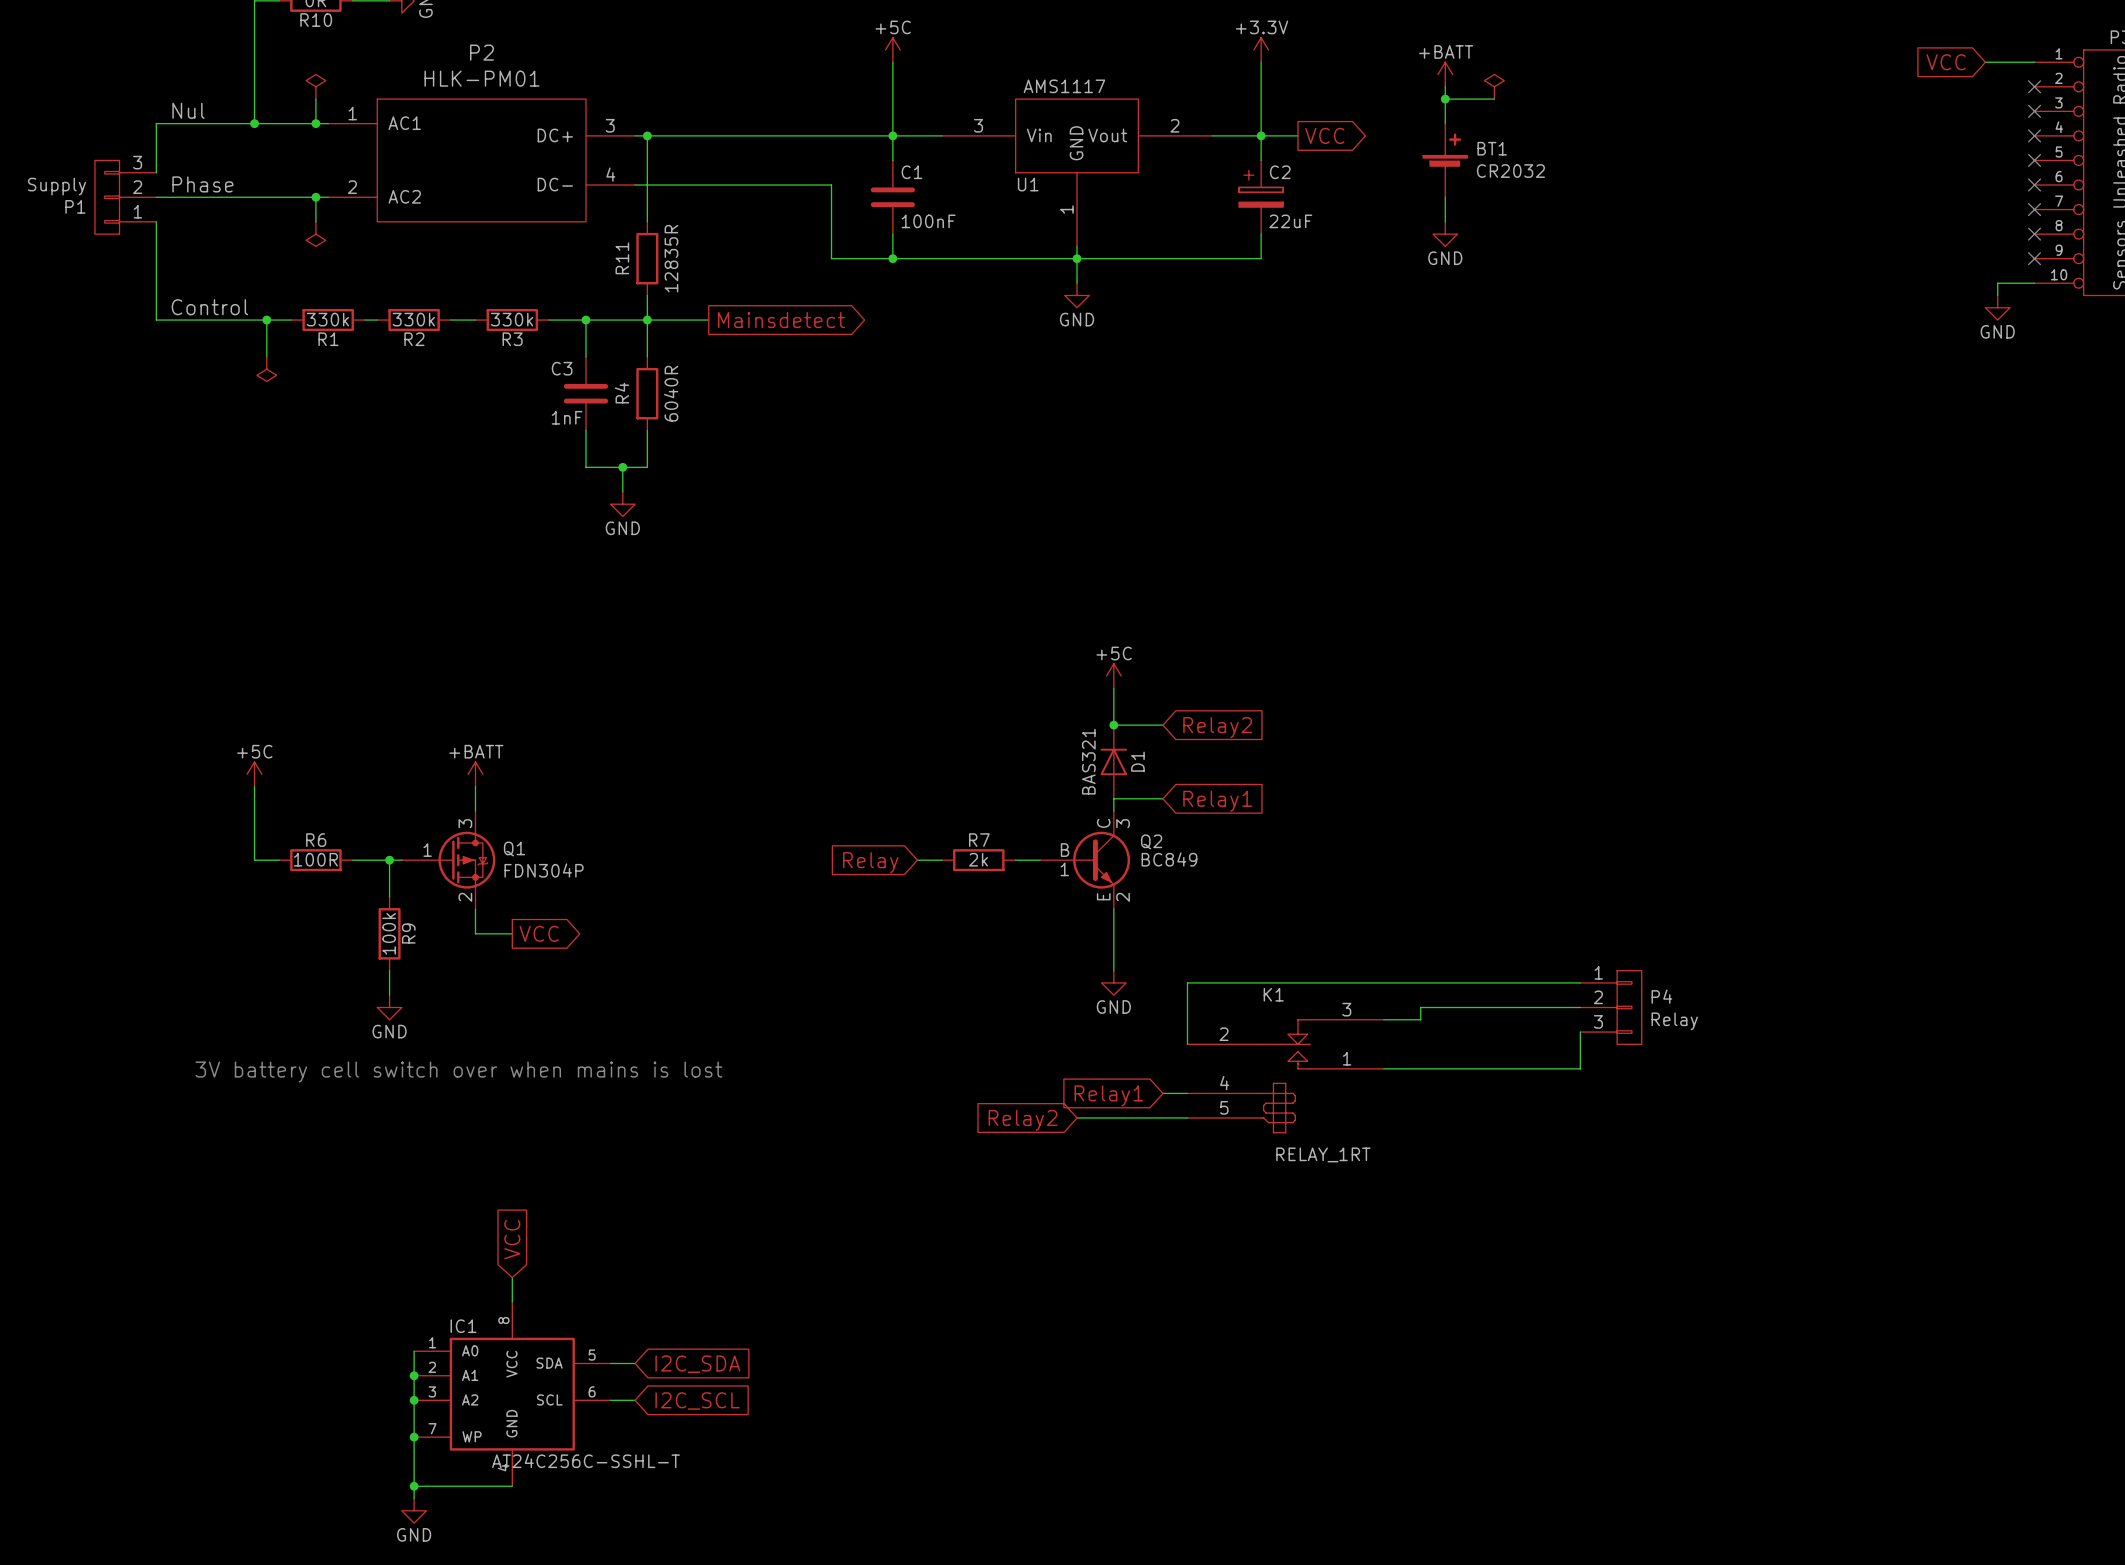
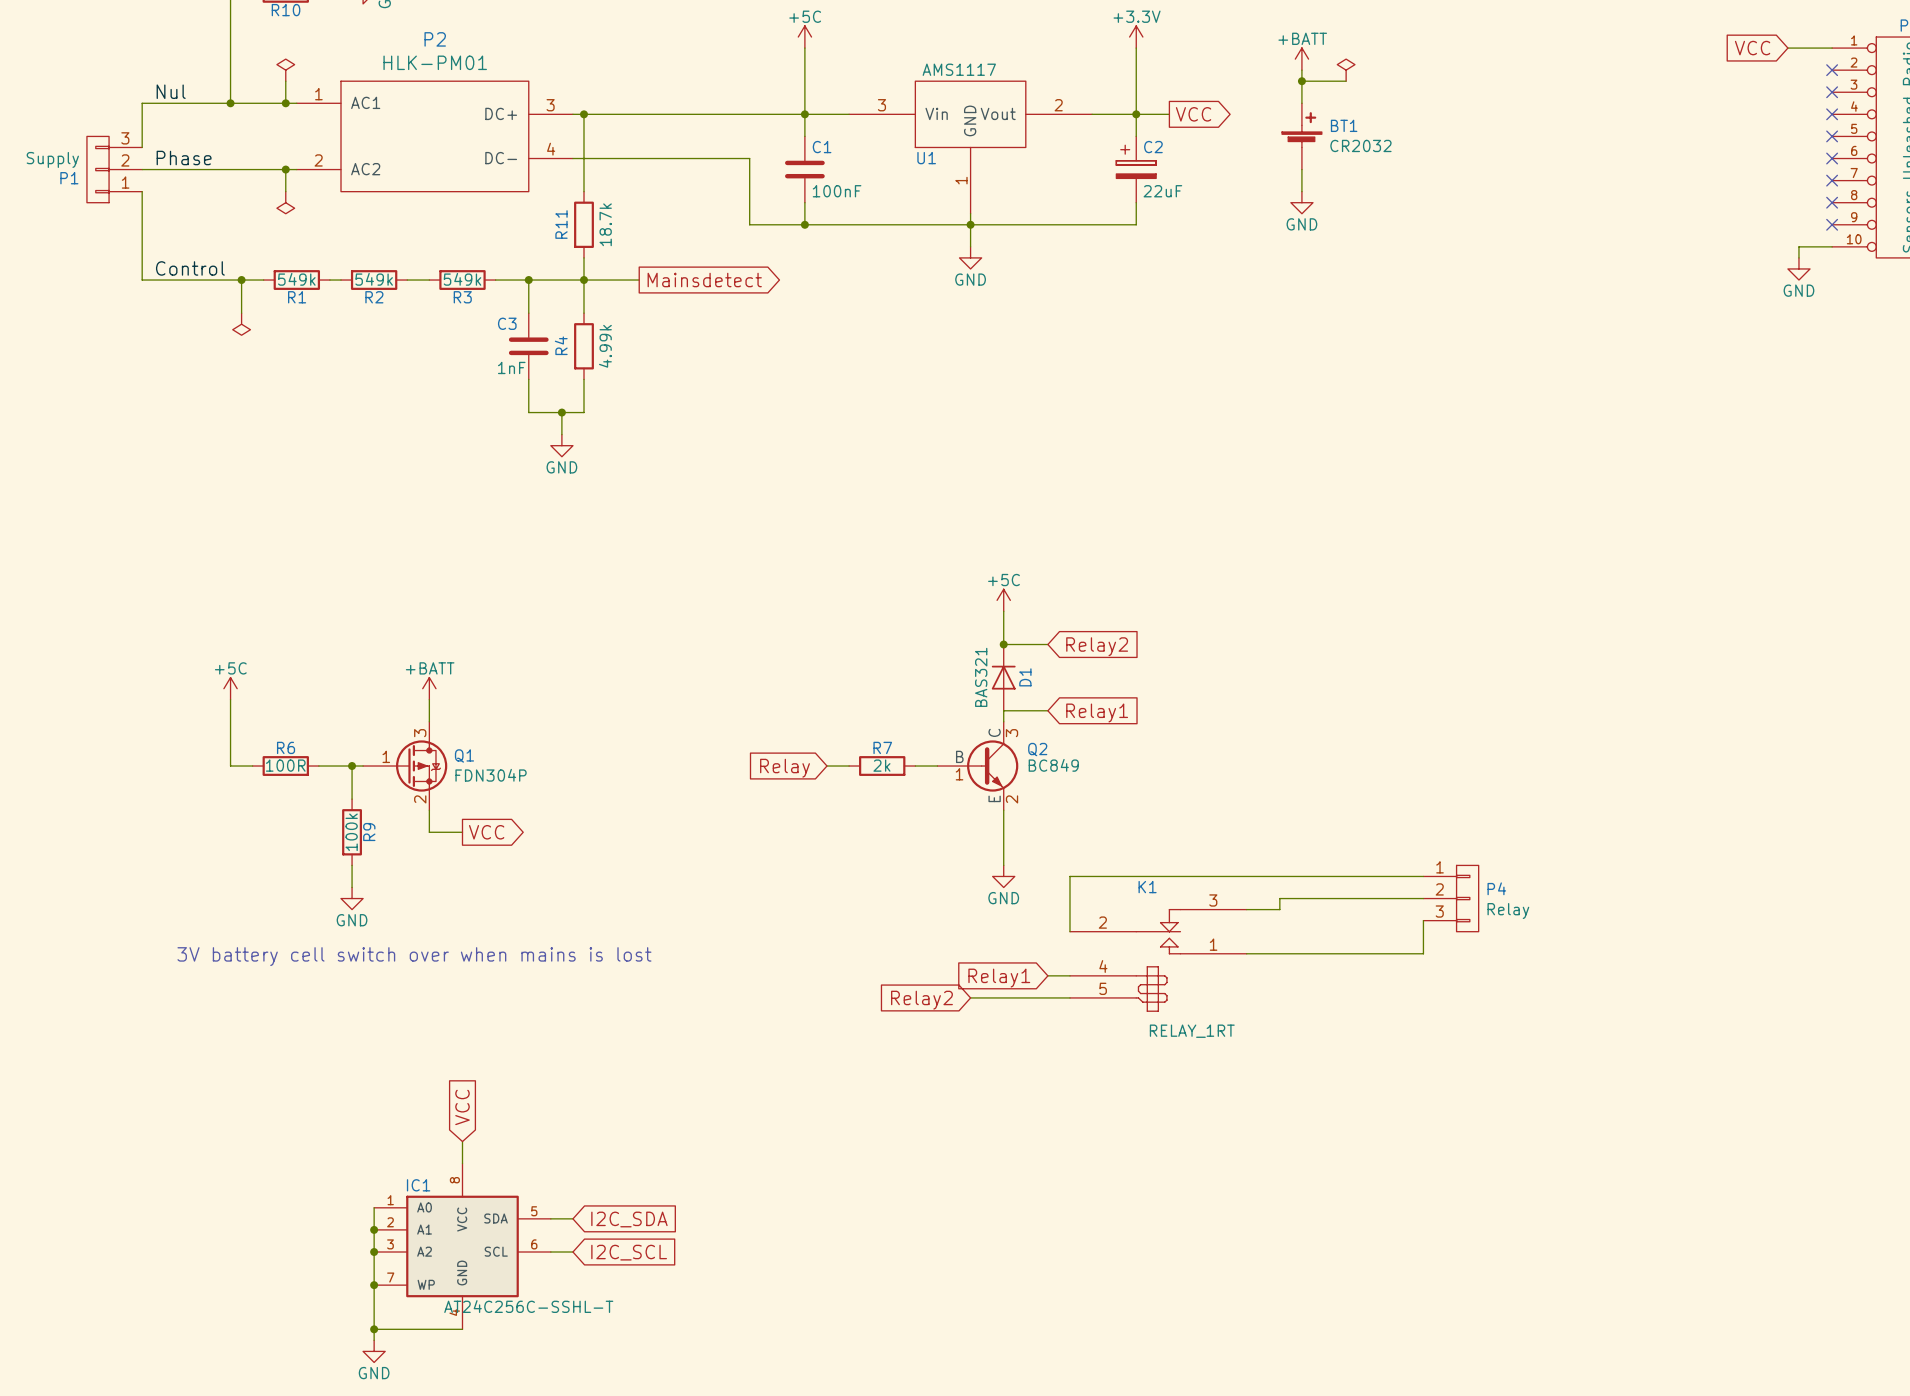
R11 value: 12835R (671, 258) -> 18.7k (605, 224)
R1 value: 330k (327, 319) -> 549k (296, 279)
R2 value: 330k (413, 319) -> 549k (374, 279)
R3 value: 330k (512, 319) -> 549k (462, 279)
R4 value: 6040R (671, 393) -> 4.99k (605, 346)

